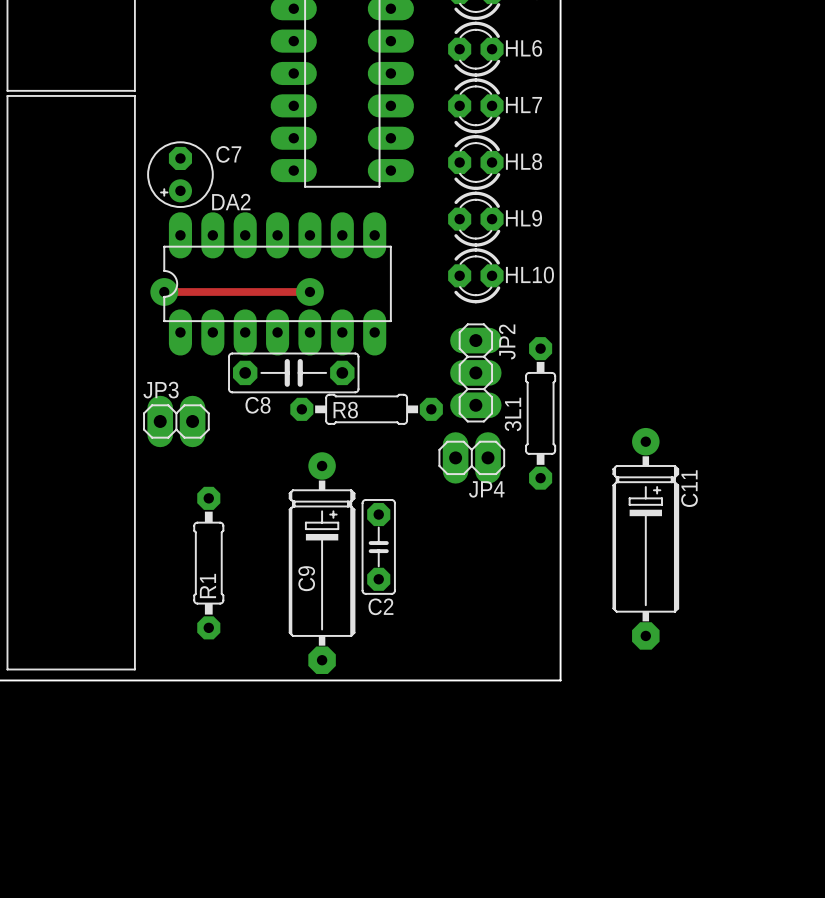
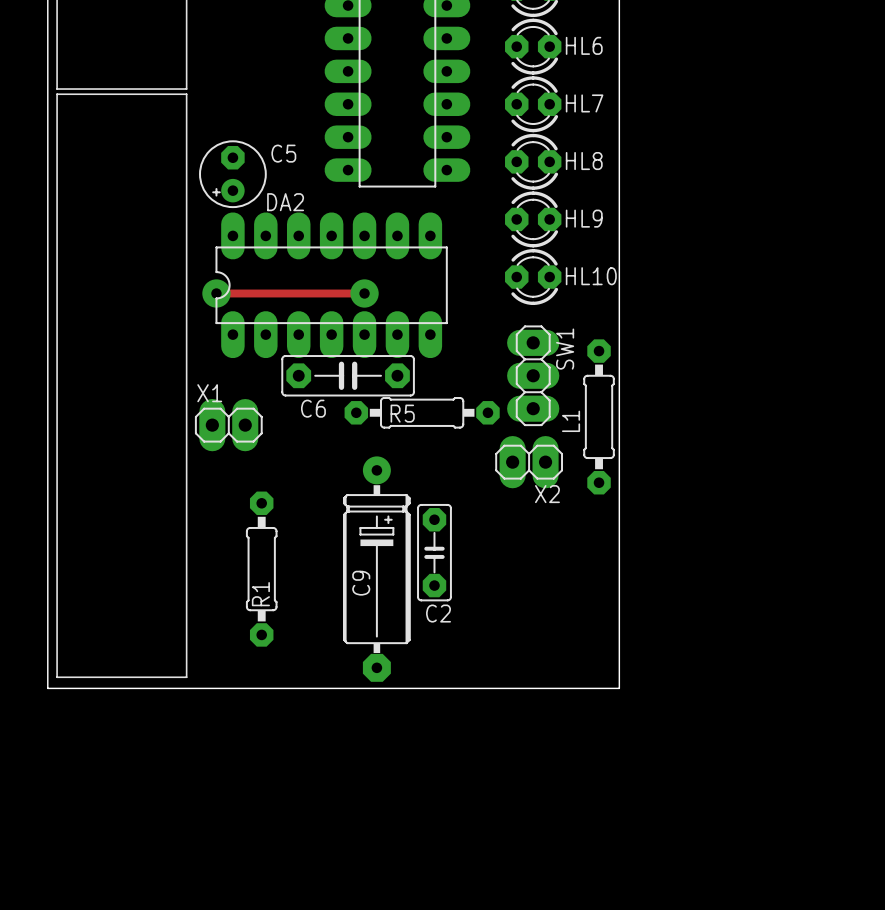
C7 name: C7 (228, 154) -> C5 (283, 153)
JP2 name: JP2 (507, 342) -> SW1 (565, 349)
JP3 name: JP3 (161, 390) -> X1 (209, 393)
C8 name: C8 (258, 405) -> C6 (313, 408)
R8 name: R8 (345, 410) -> R5 (402, 413)
3L1 name: 3L1 (513, 414) -> L1 (571, 421)
JP4 name: JP4 (486, 489) -> X2 (547, 494)
C11: (645, 538) -> none

